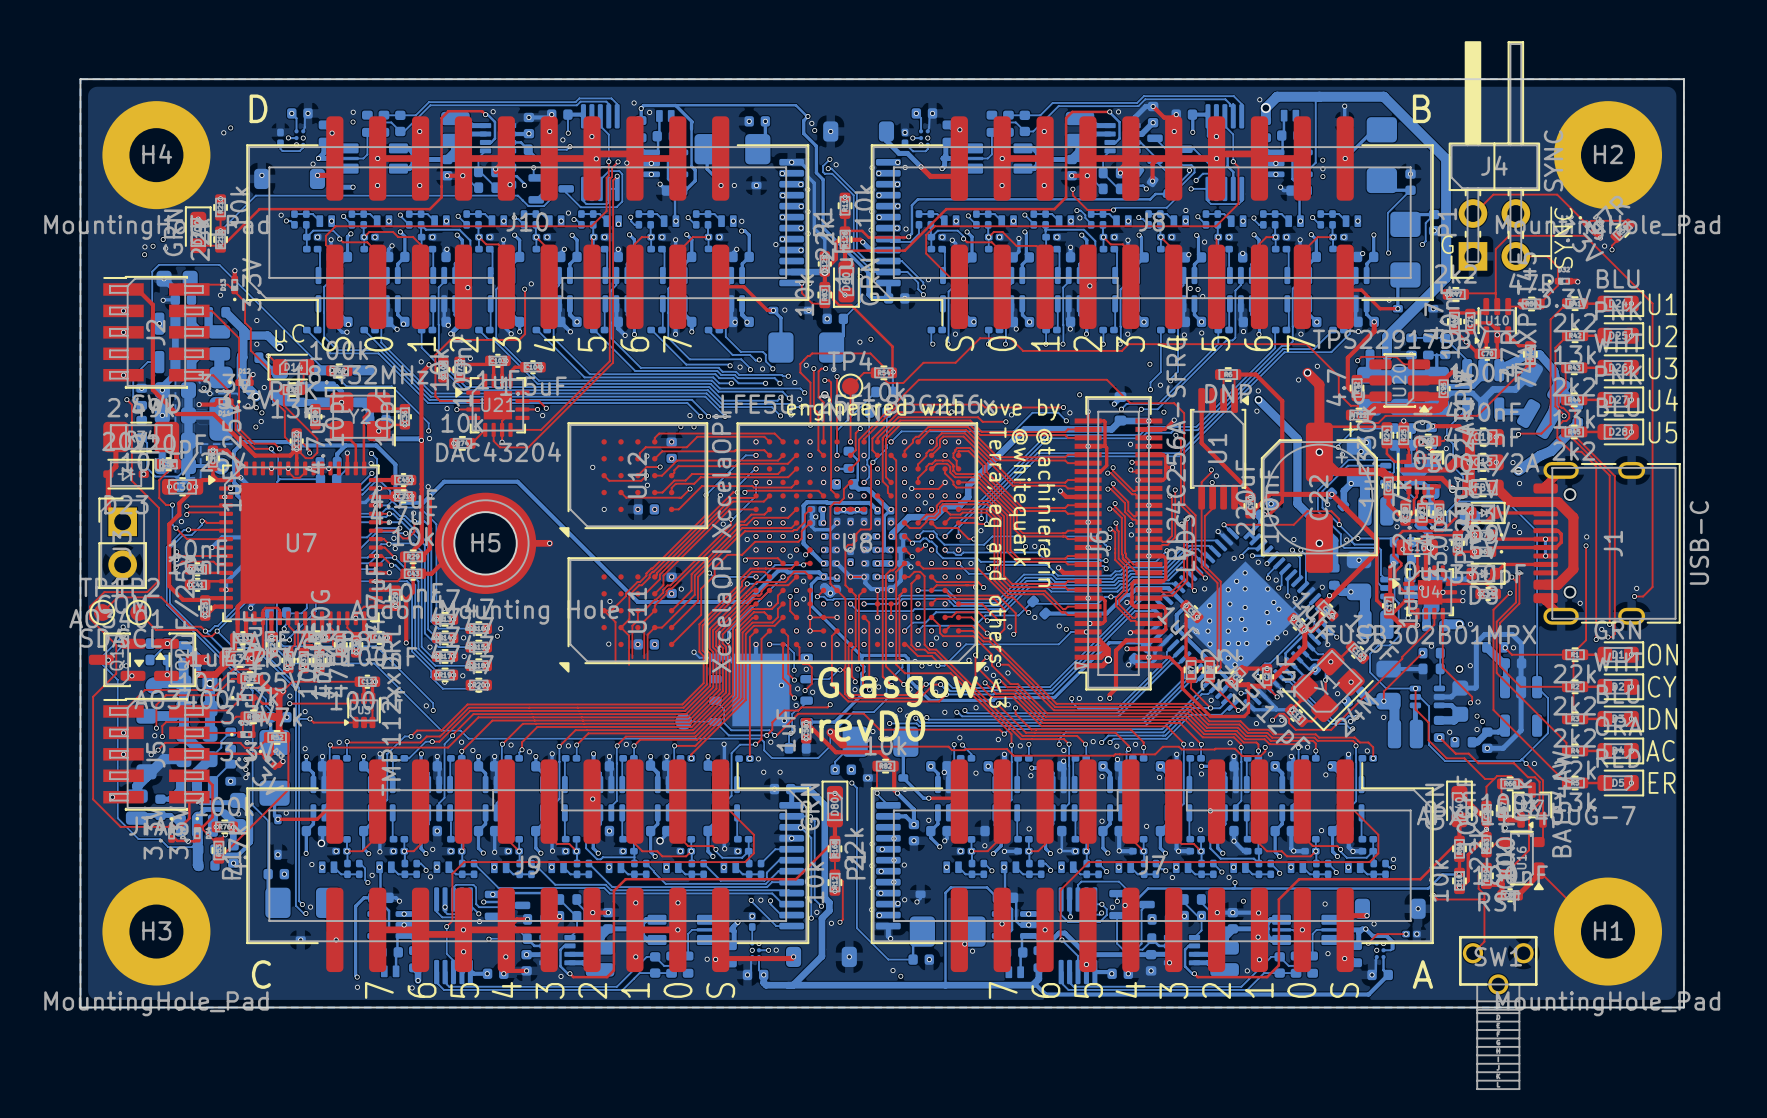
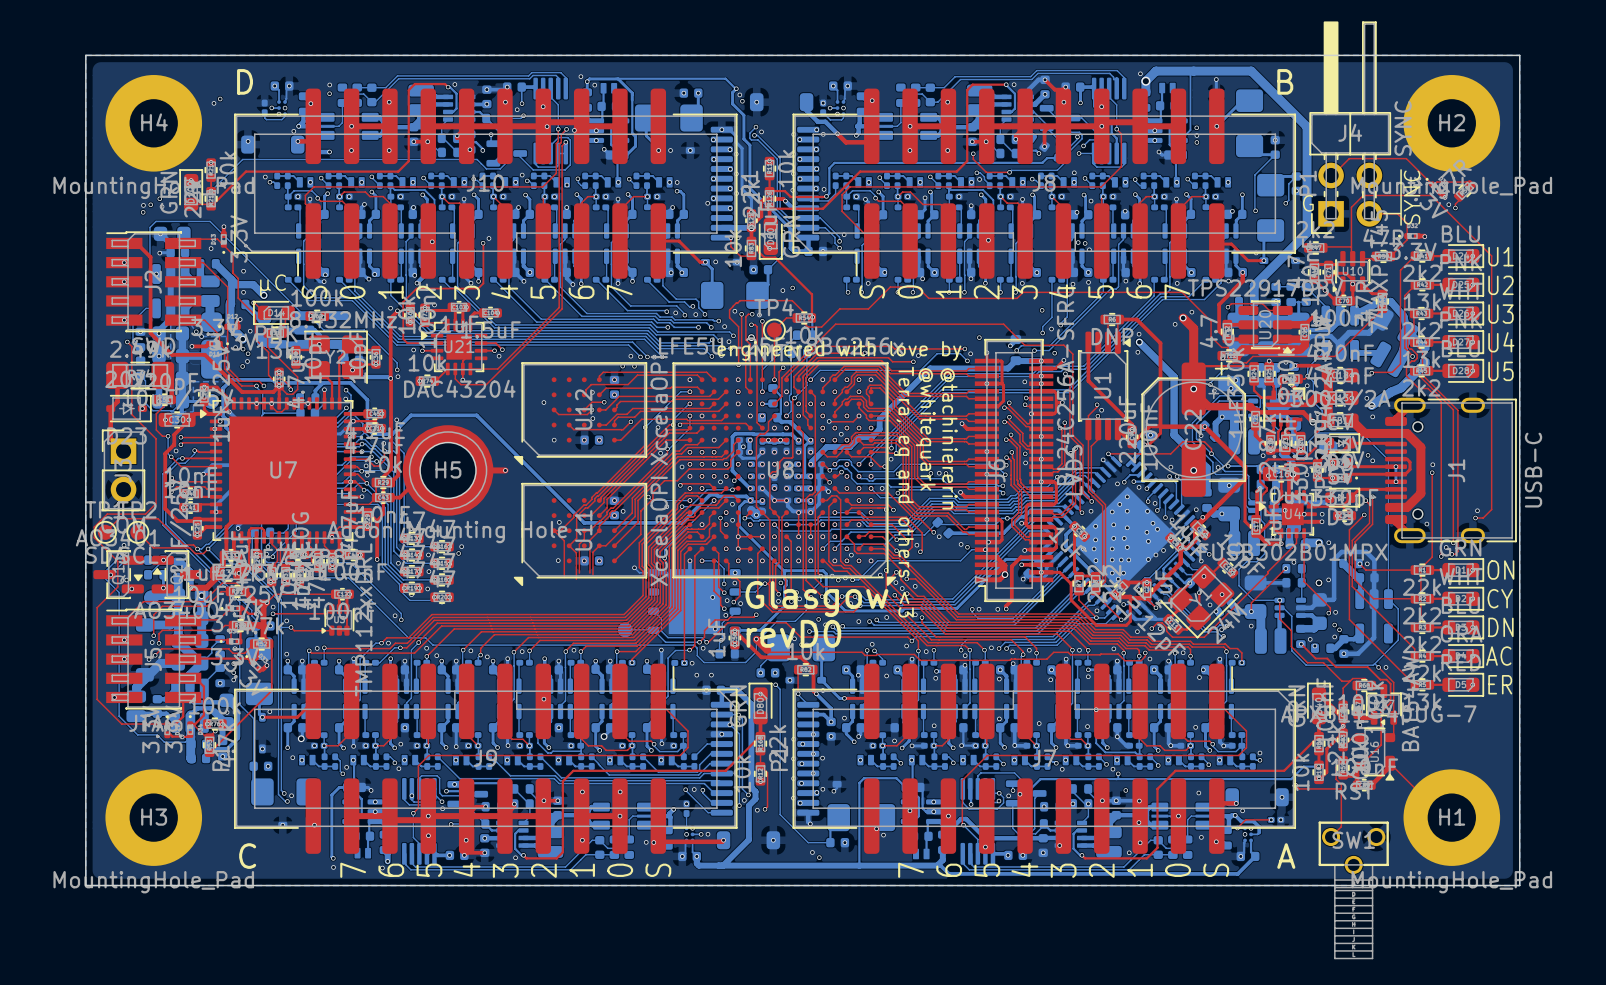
via: none -> (798, 560)

